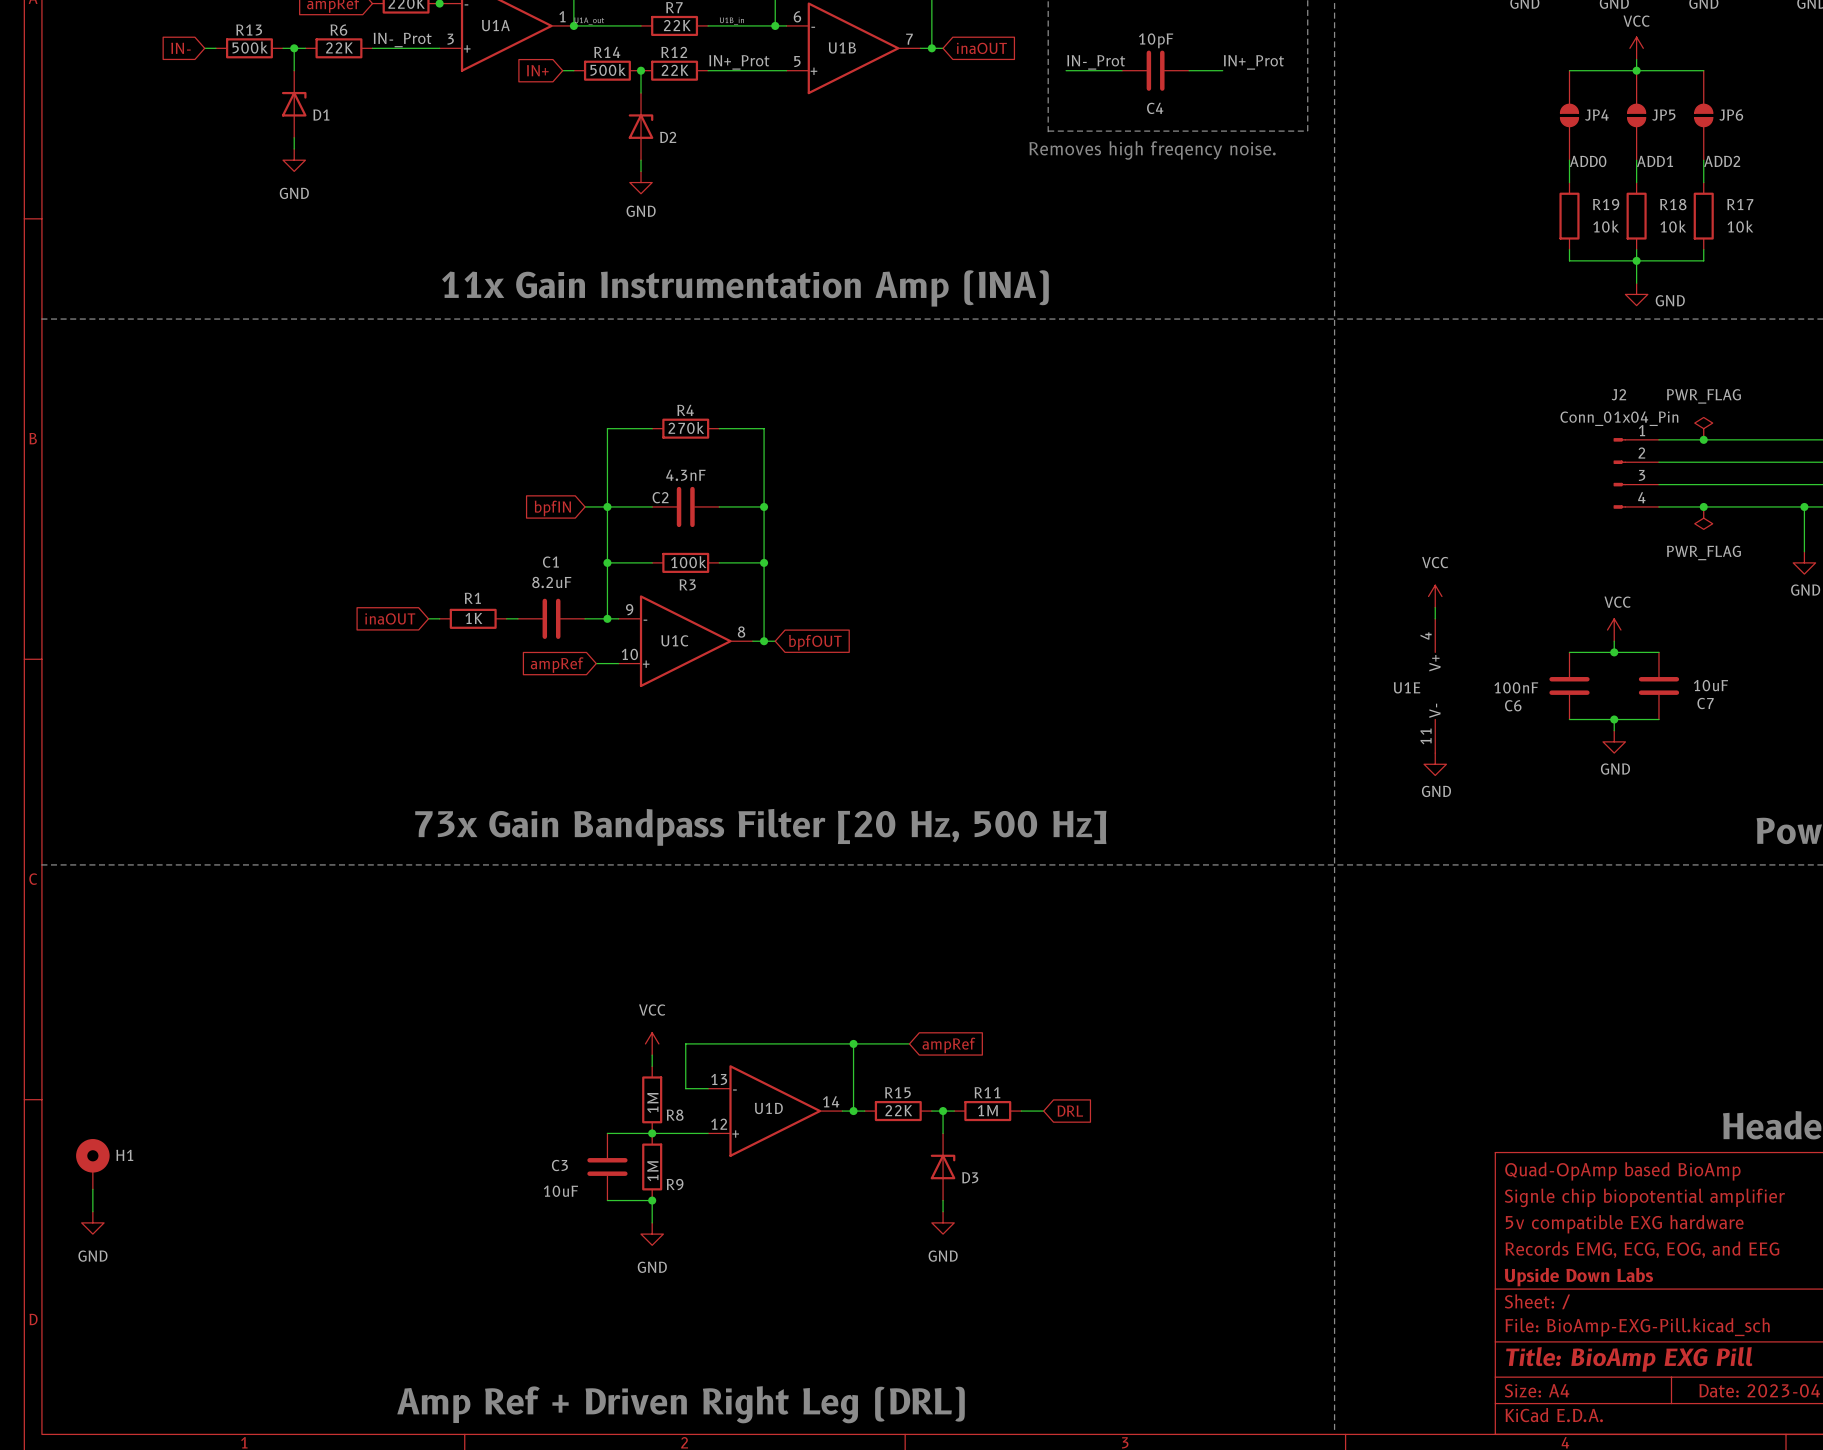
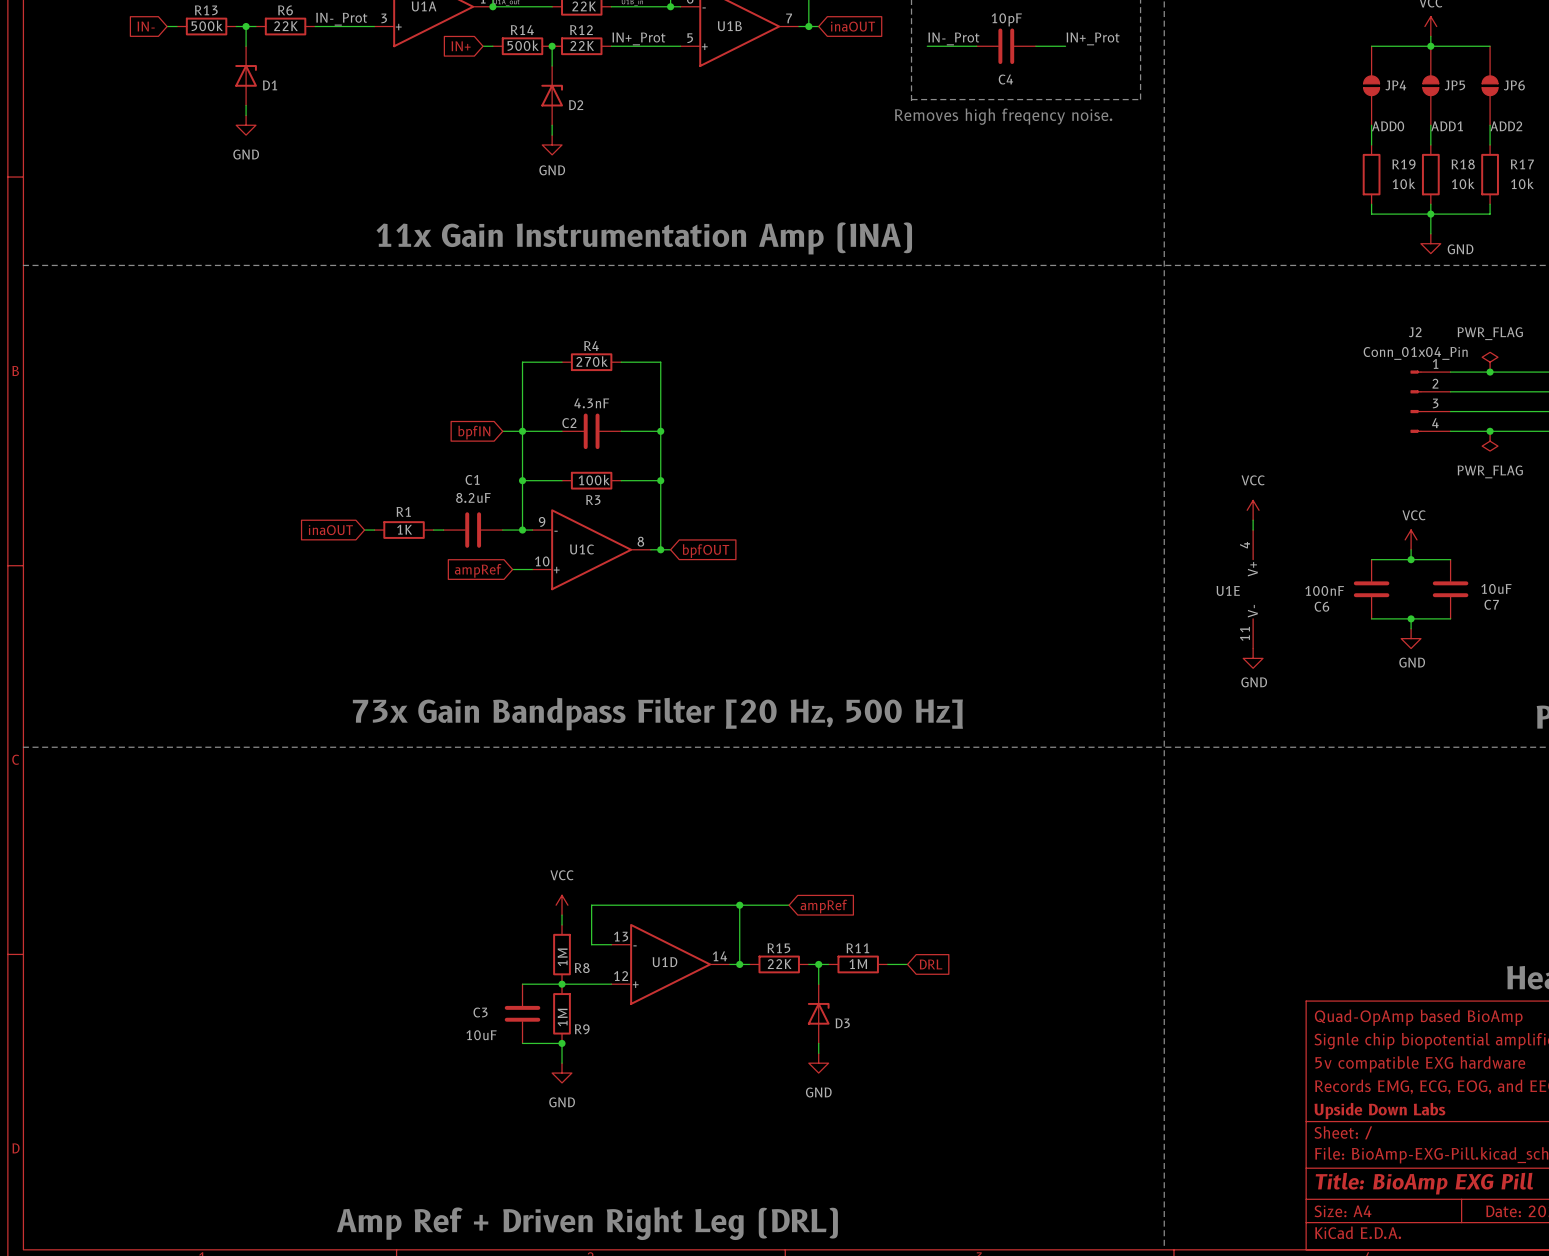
H1: (92, 1164) -> none
wire: (92, 1189) (92, 1211) -> none
power symbol: GND (92, 1222) -> none

